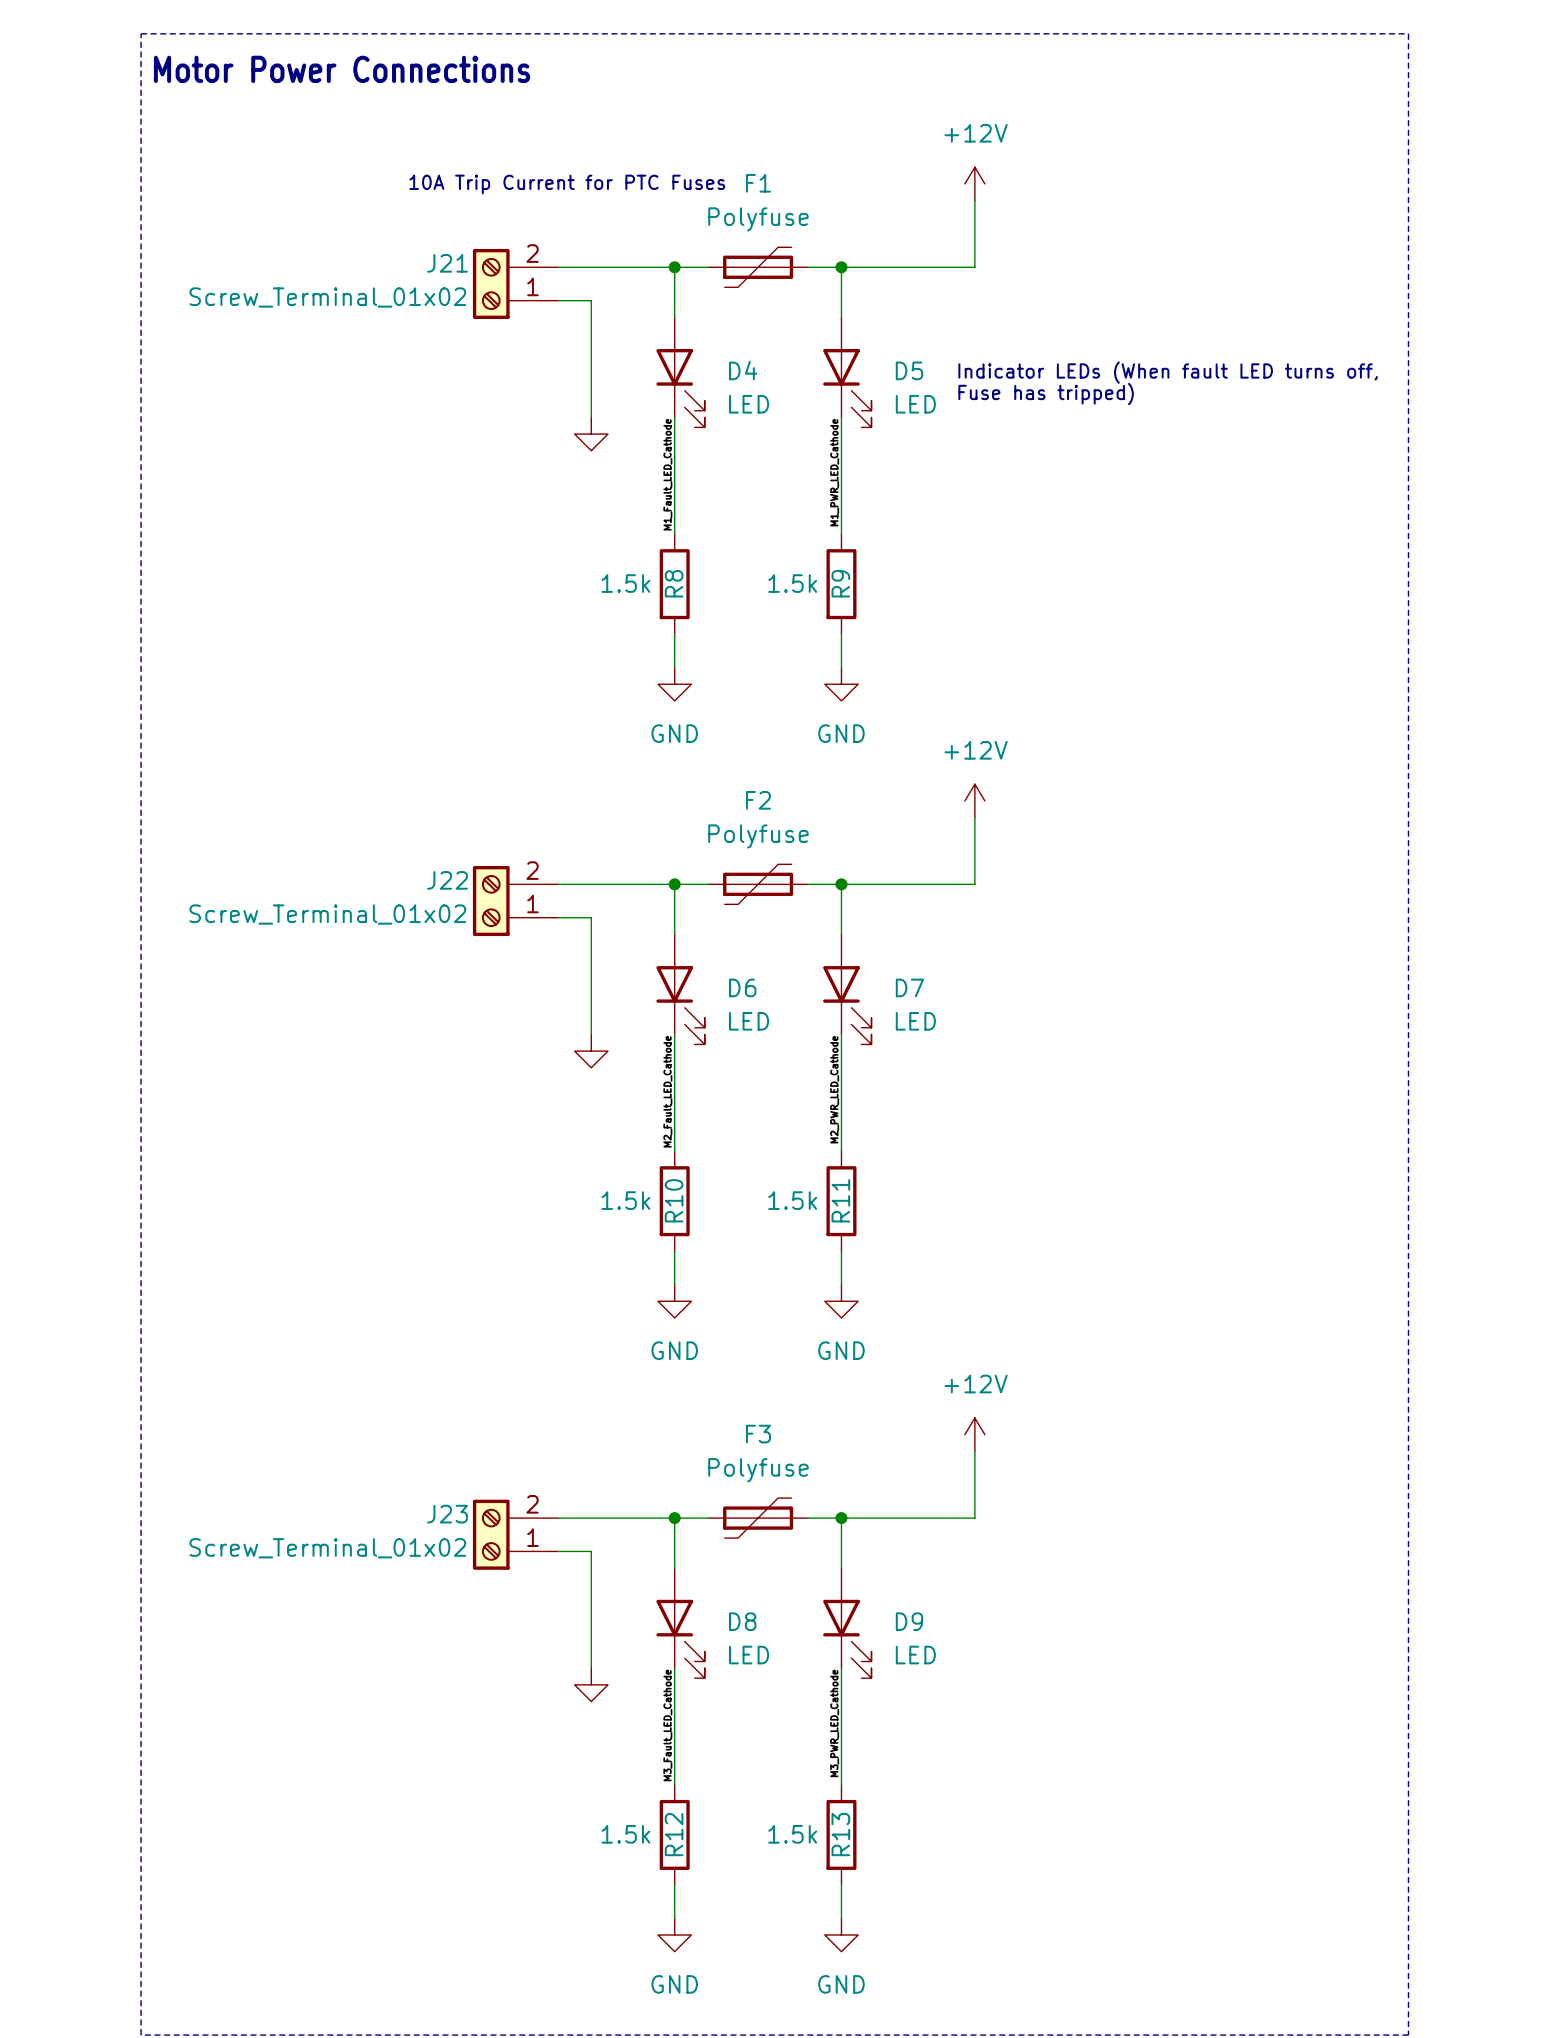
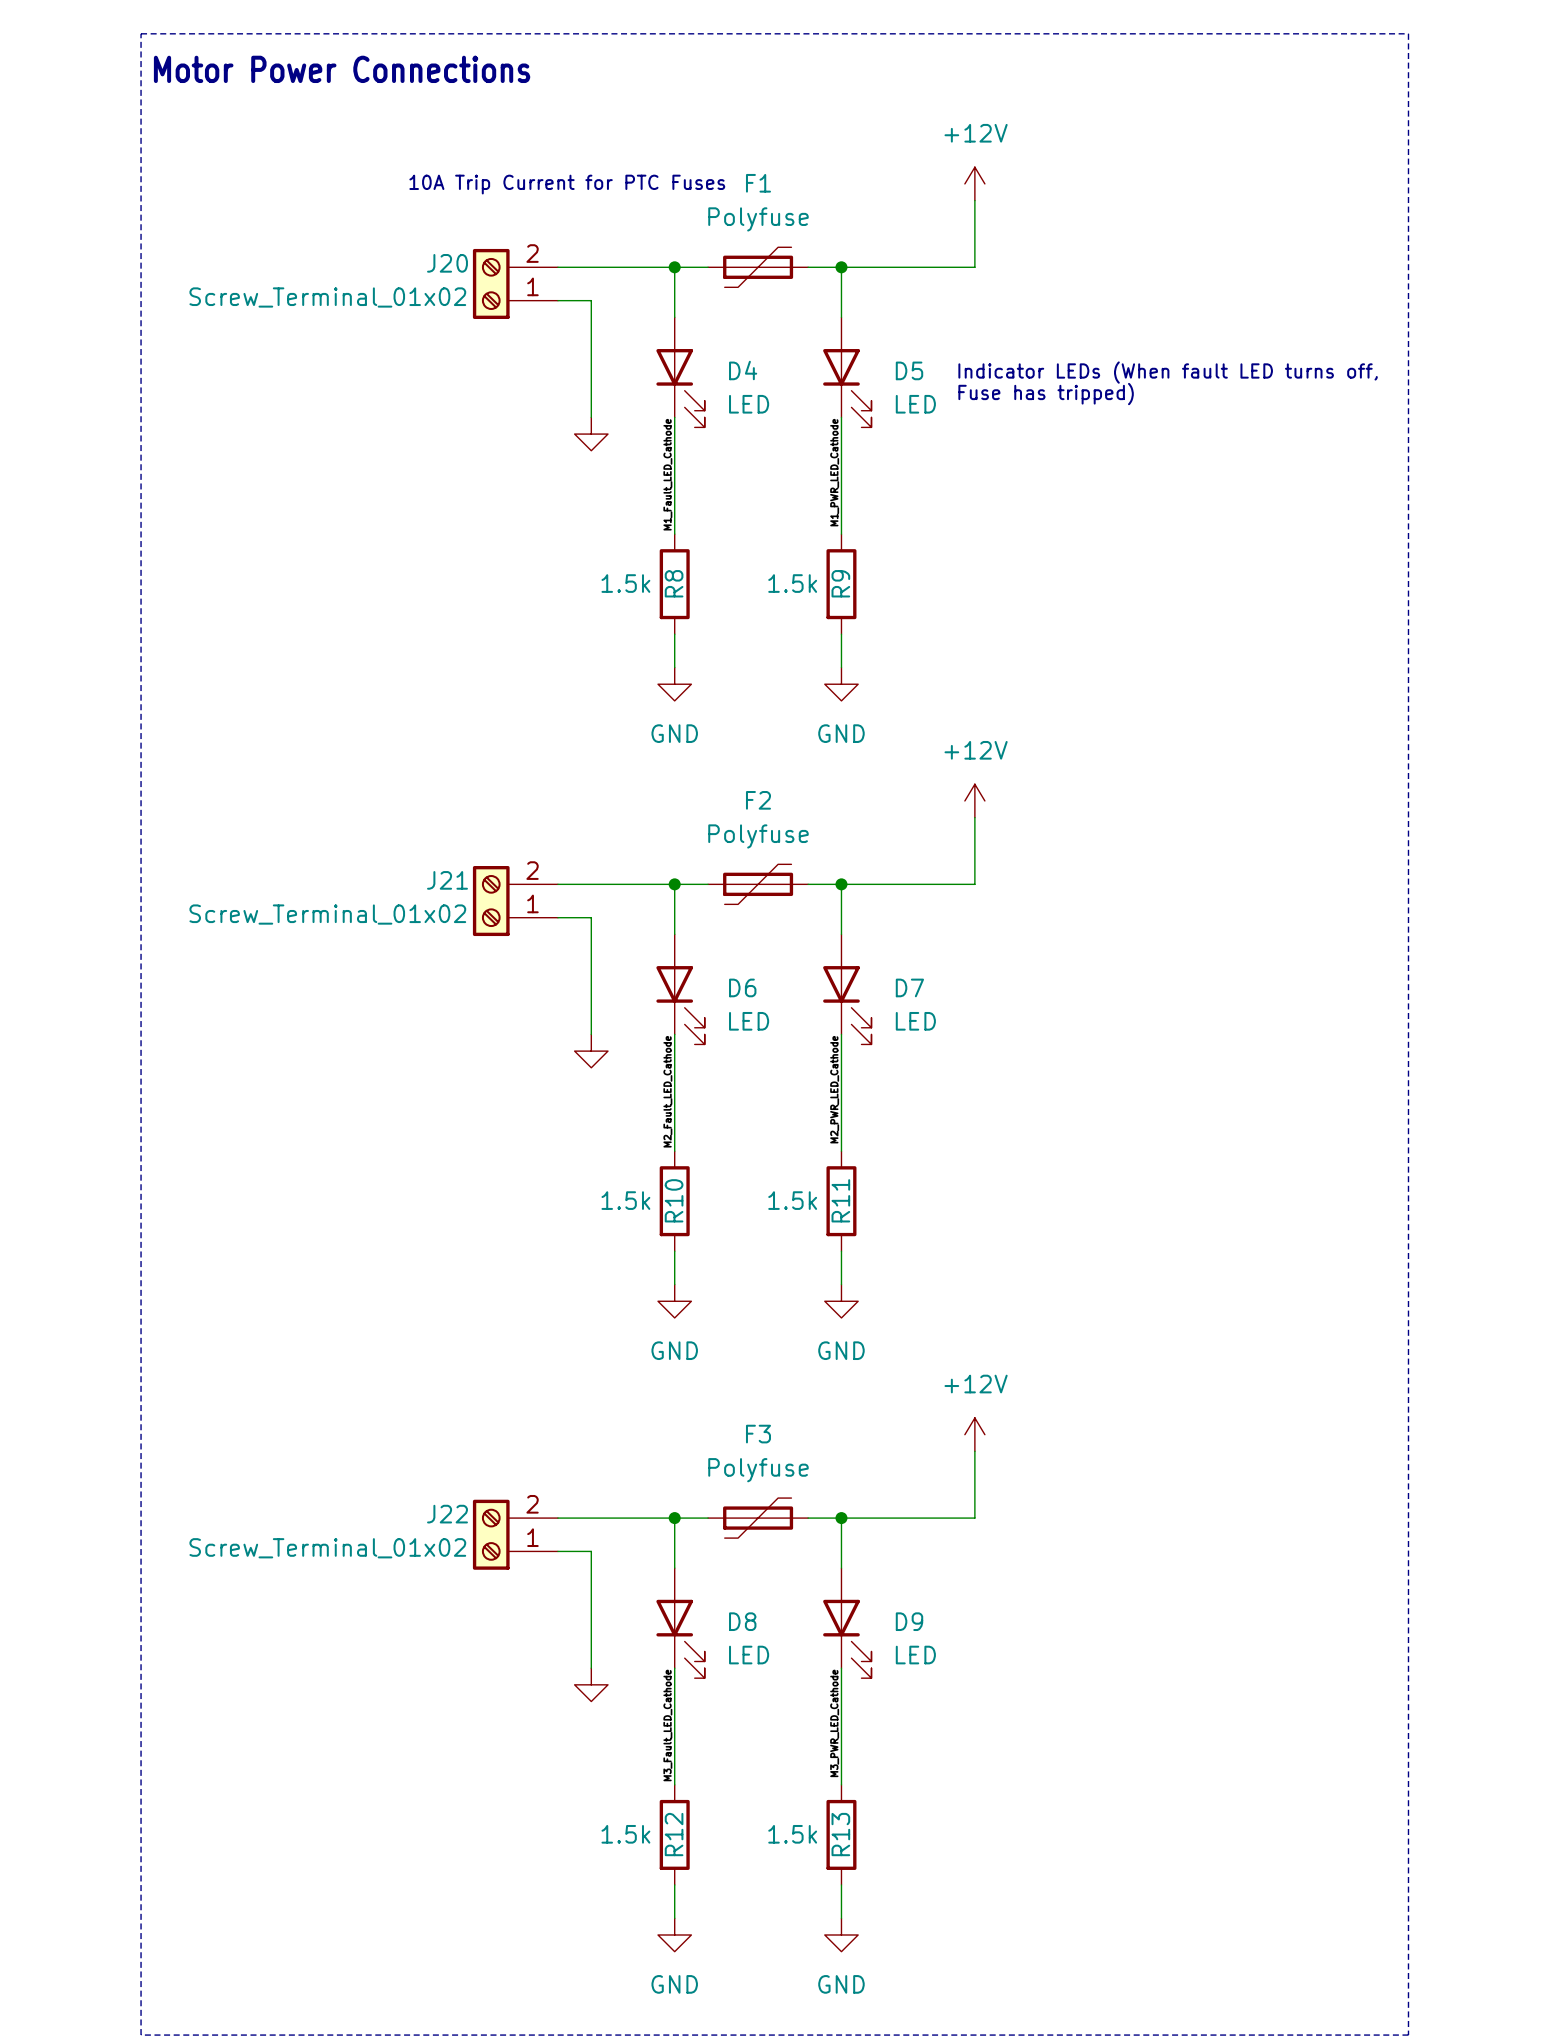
J21 name: J21 (447, 263) -> J20 (447, 263)
J22 name: J22 (447, 880) -> J21 (447, 880)
J23 name: J23 (447, 1514) -> J22 (447, 1514)

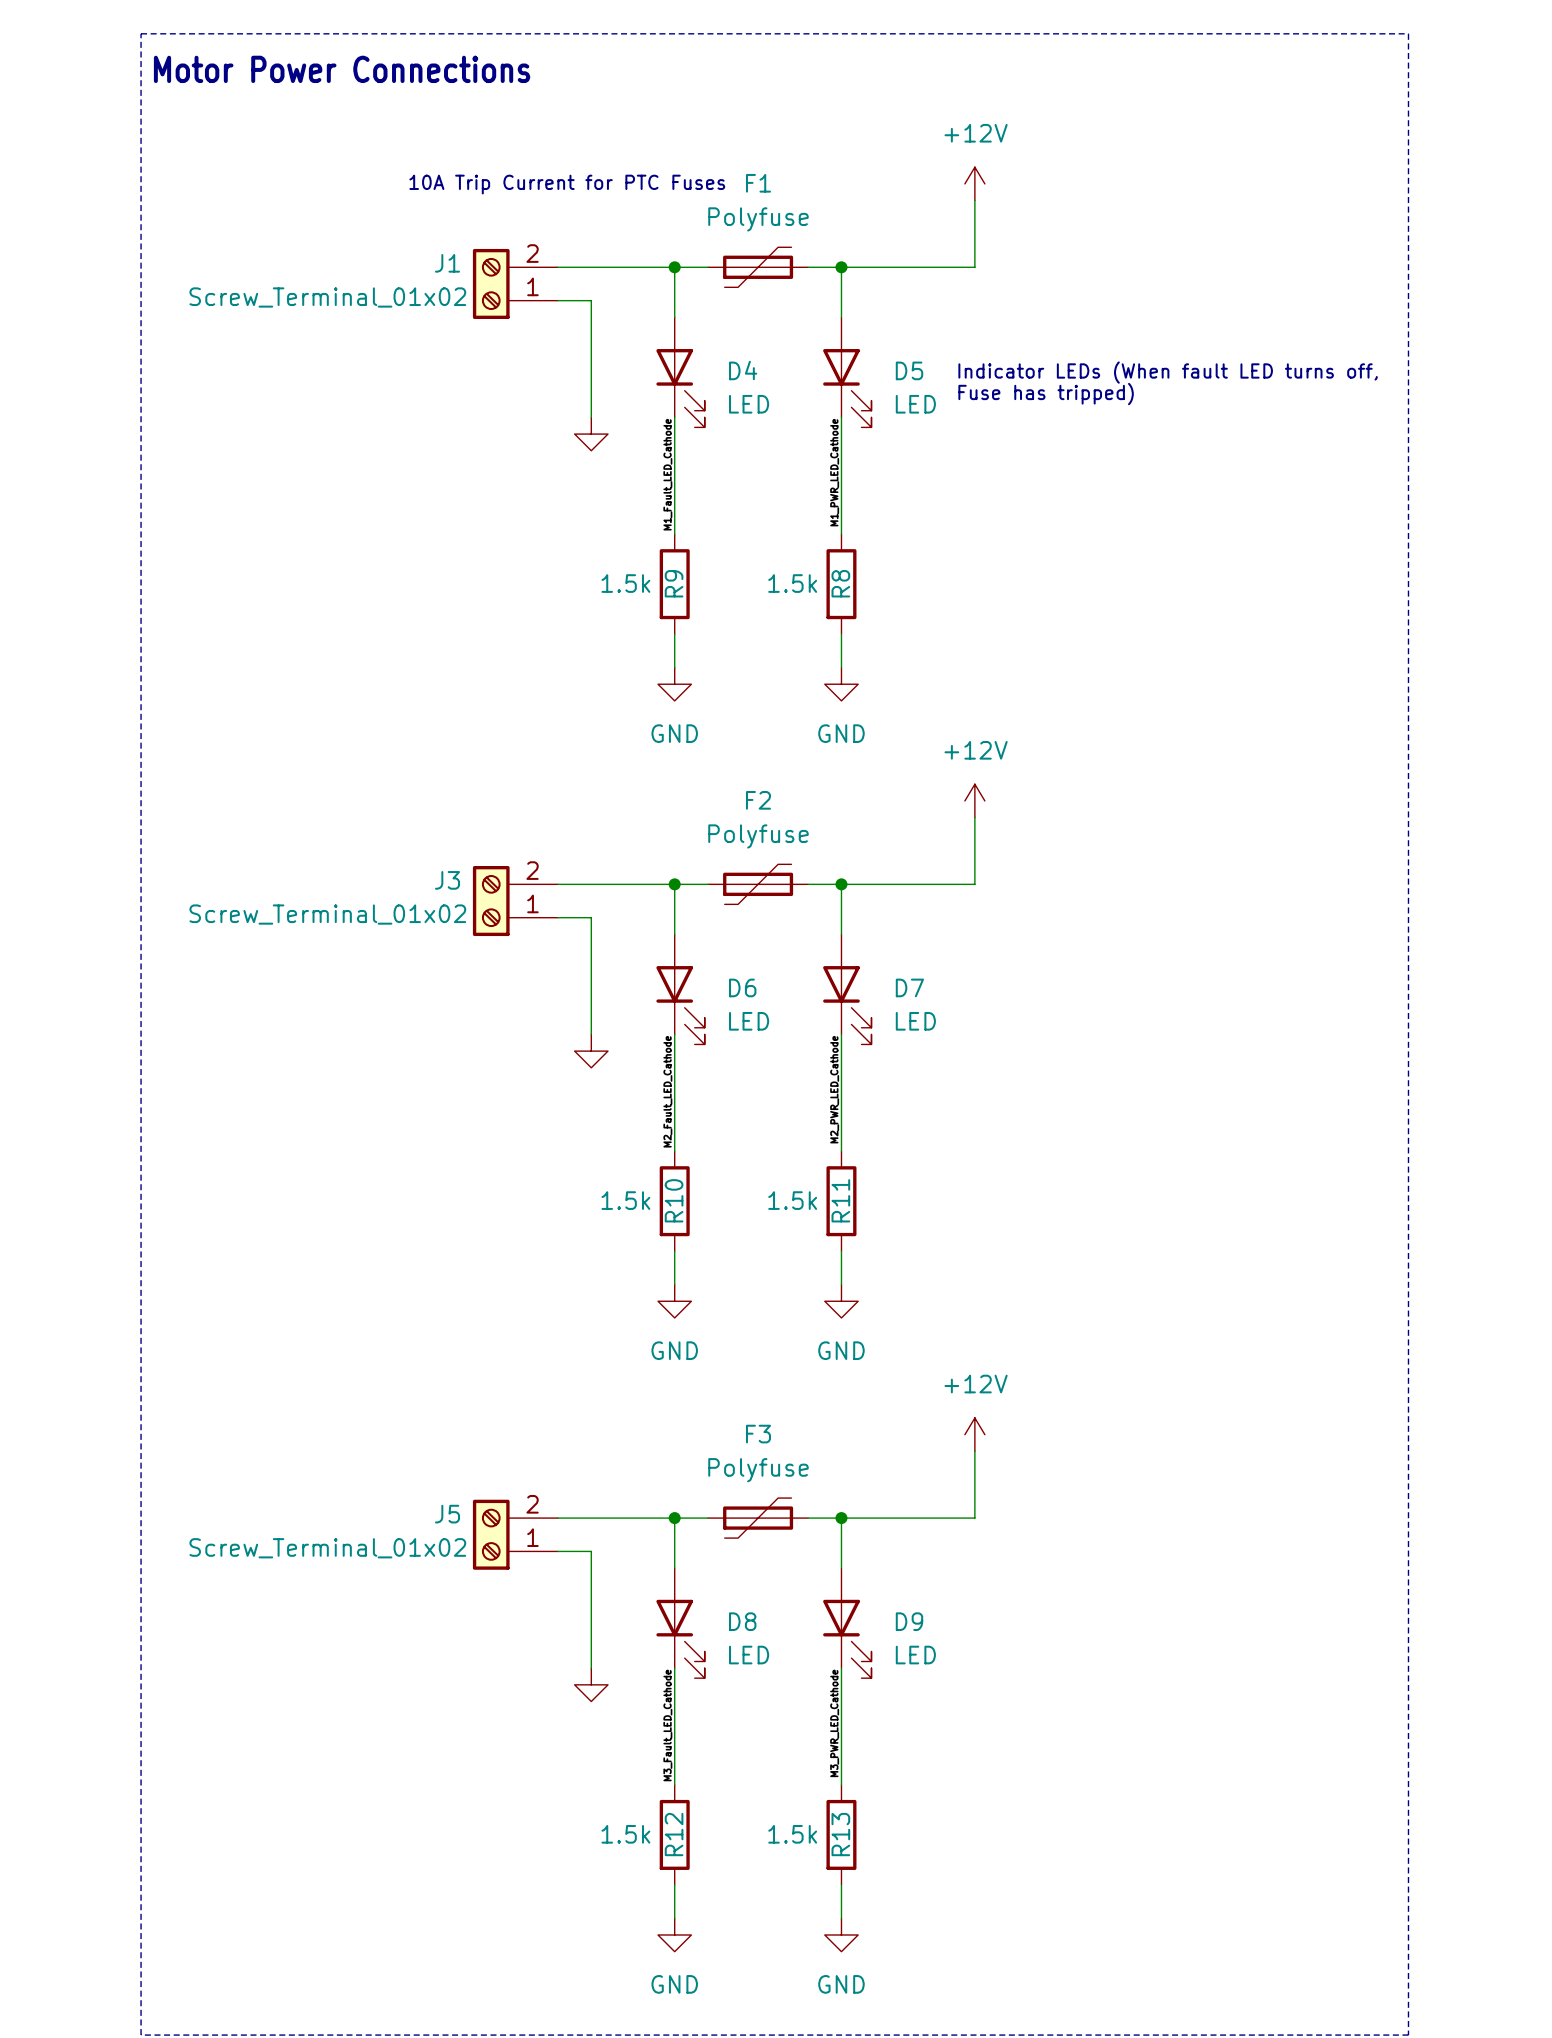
J20 name: J20 (447, 263) -> J1 (447, 263)
R8 name: R8 (674, 583) -> R9 (674, 583)
R9 name: R9 (840, 583) -> R8 (840, 583)
J21 name: J21 (447, 880) -> J3 (447, 880)
J22 name: J22 (447, 1514) -> J5 (447, 1514)

